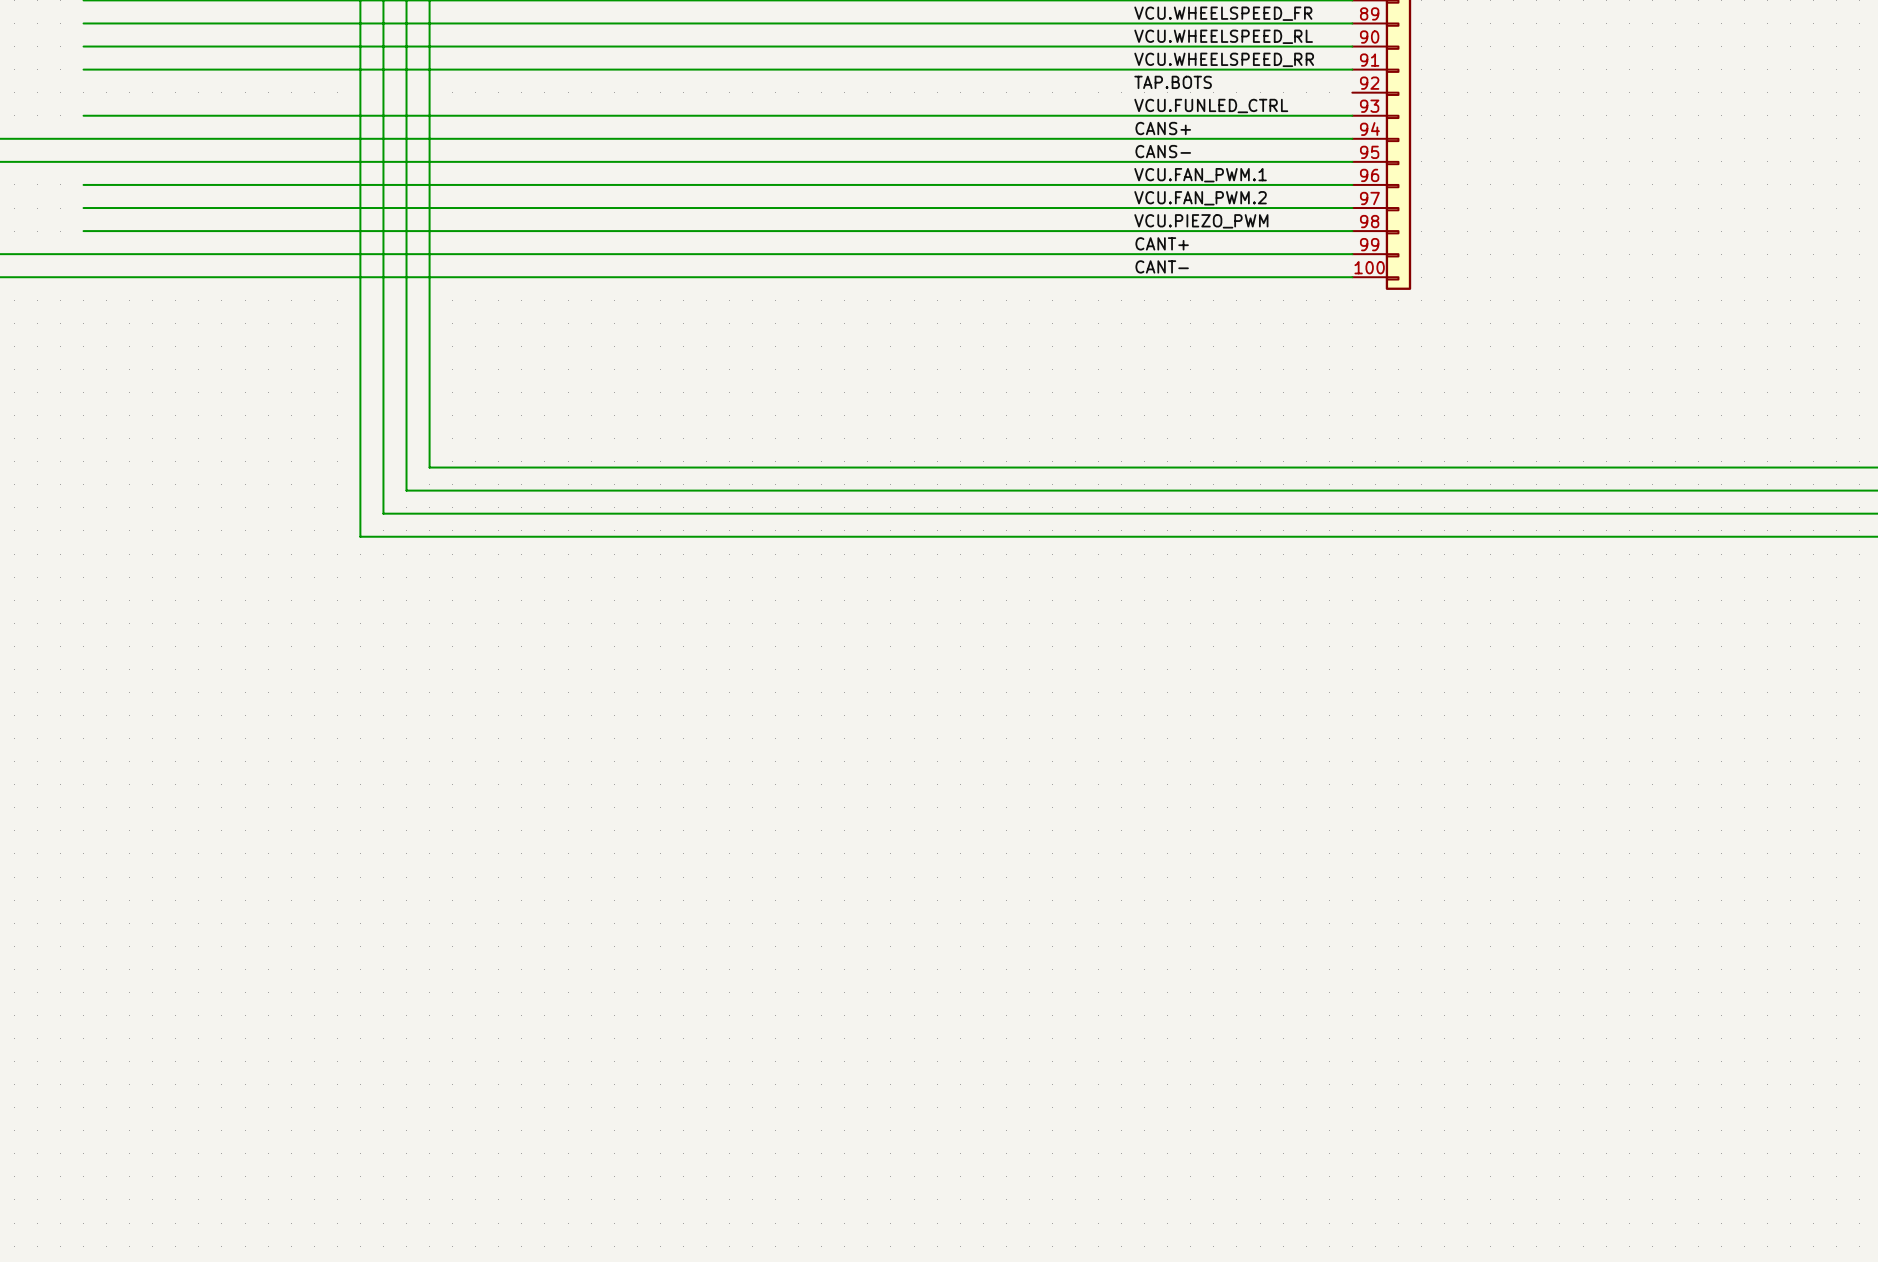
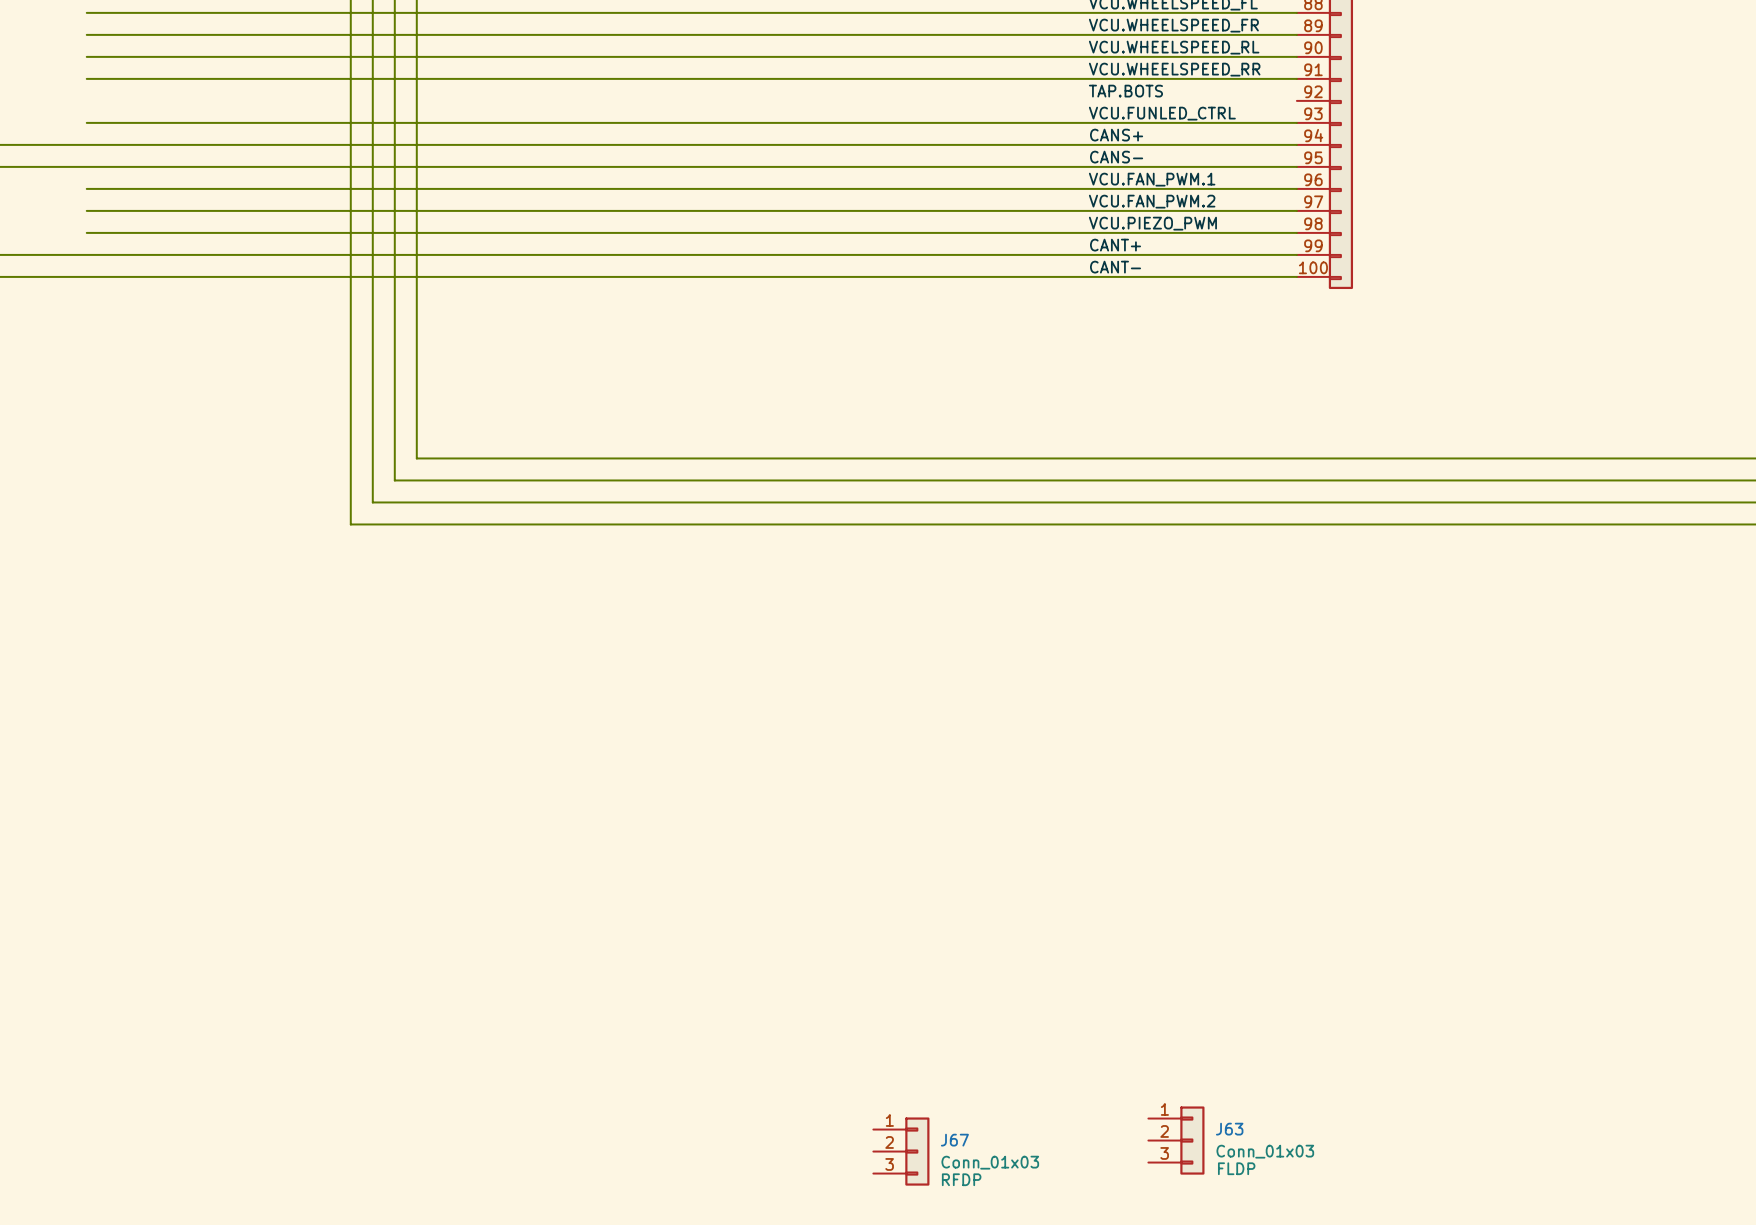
J63: none -> Conn_01x03 (1176, 1140)
J67: none -> Conn_01x03 (901, 1151)

